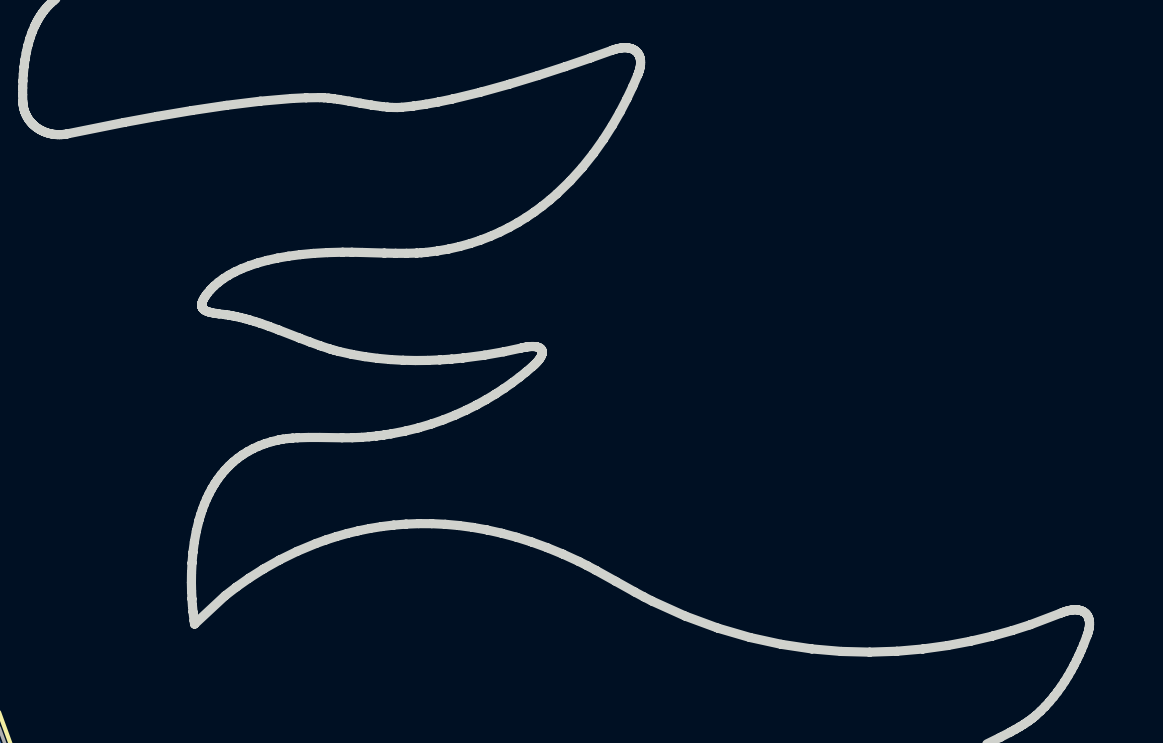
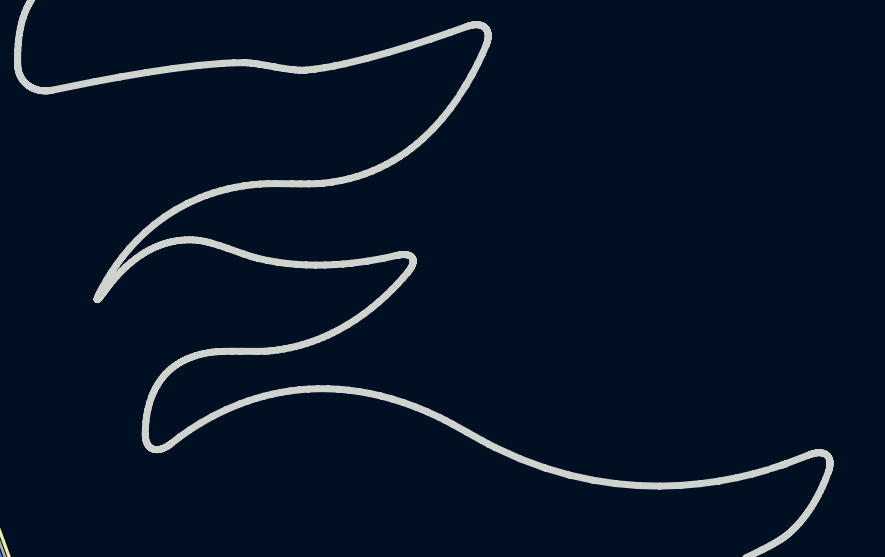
board edge: (603, 139) (582, 167) (549, 200) (517, 222) (480, 240) (448, 248) (425, 252) (327, 252) (277, 258) (234, 271) (210, 289) (201, 303) (202, 307) (205, 310) (249, 320) (320, 345) (351, 354) (415, 360) (462, 358) (530, 346) (539, 347) (542, 352) (532, 366) (495, 394) (465, 410) (431, 424) (405, 431) (369, 436) (282, 439) (258, 446) (237, 458) (224, 470) (214, 483) (199, 520) (194, 541) (191, 573) (194, 624) (236, 587) (263, 569) (297, 551) (326, 539) (358, 530) (393, 525) (431, 523) (487, 529) (531, 542) (578, 561) (652, 601) (685, 616) (717, 628) (781, 644) (841, 651) (896, 651) (947, 645) (1012, 630) -> none
board edge: none -> (458, 97) (442, 118) (417, 143) (393, 160) (372, 170) (349, 178) (323, 183) (267, 183) (235, 187) (206, 195) (175, 210) (154, 224) (129, 248) (111, 272) (97, 298)
board edge: none -> (98, 299) (116, 275) (136, 258) (156, 246) (177, 240) (204, 241) (257, 258) (296, 264) (342, 264) (402, 254) (409, 255) (412, 258) (412, 264) (408, 271) (379, 301) (355, 319) (328, 335) (301, 344) (278, 349) (204, 353) (187, 358) (173, 366) (157, 384) (147, 409) (145, 438) (148, 445) (154, 449) (165, 447) (212, 416) (247, 401) (289, 390) (328, 388) (369, 393) (403, 402) (439, 417) (520, 458) (544, 467) (592, 480) (638, 485) (680, 485) (718, 481) (767, 469)

